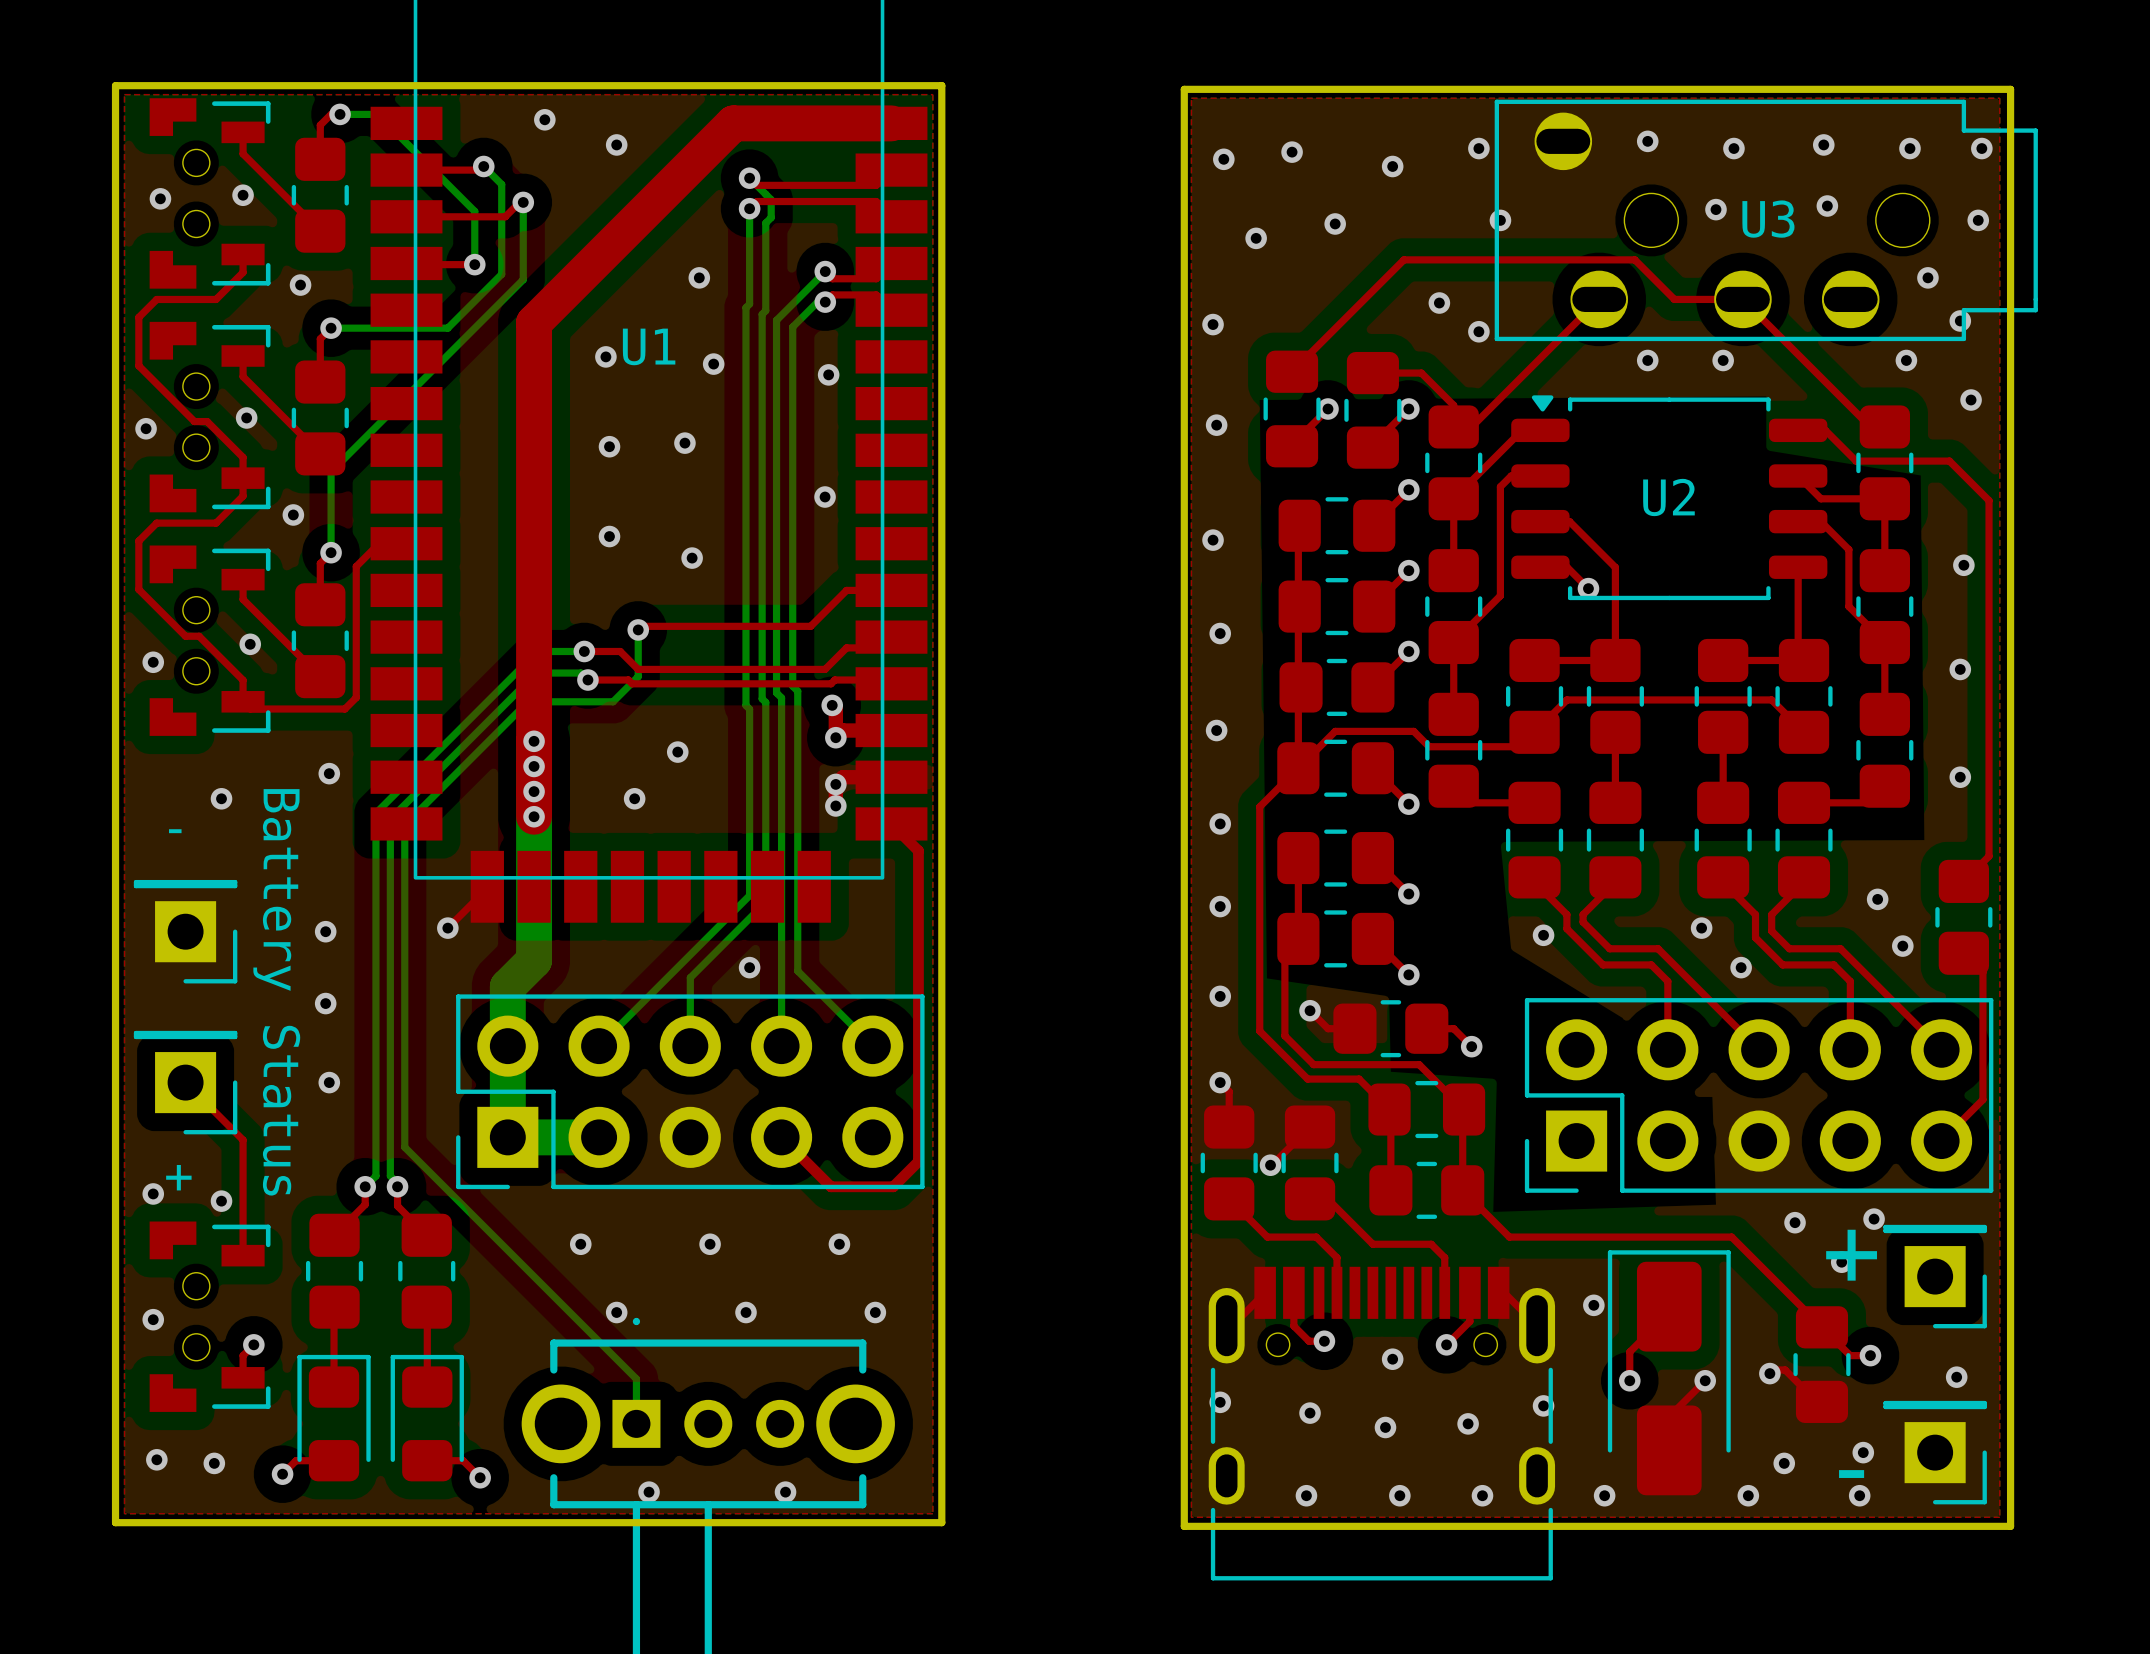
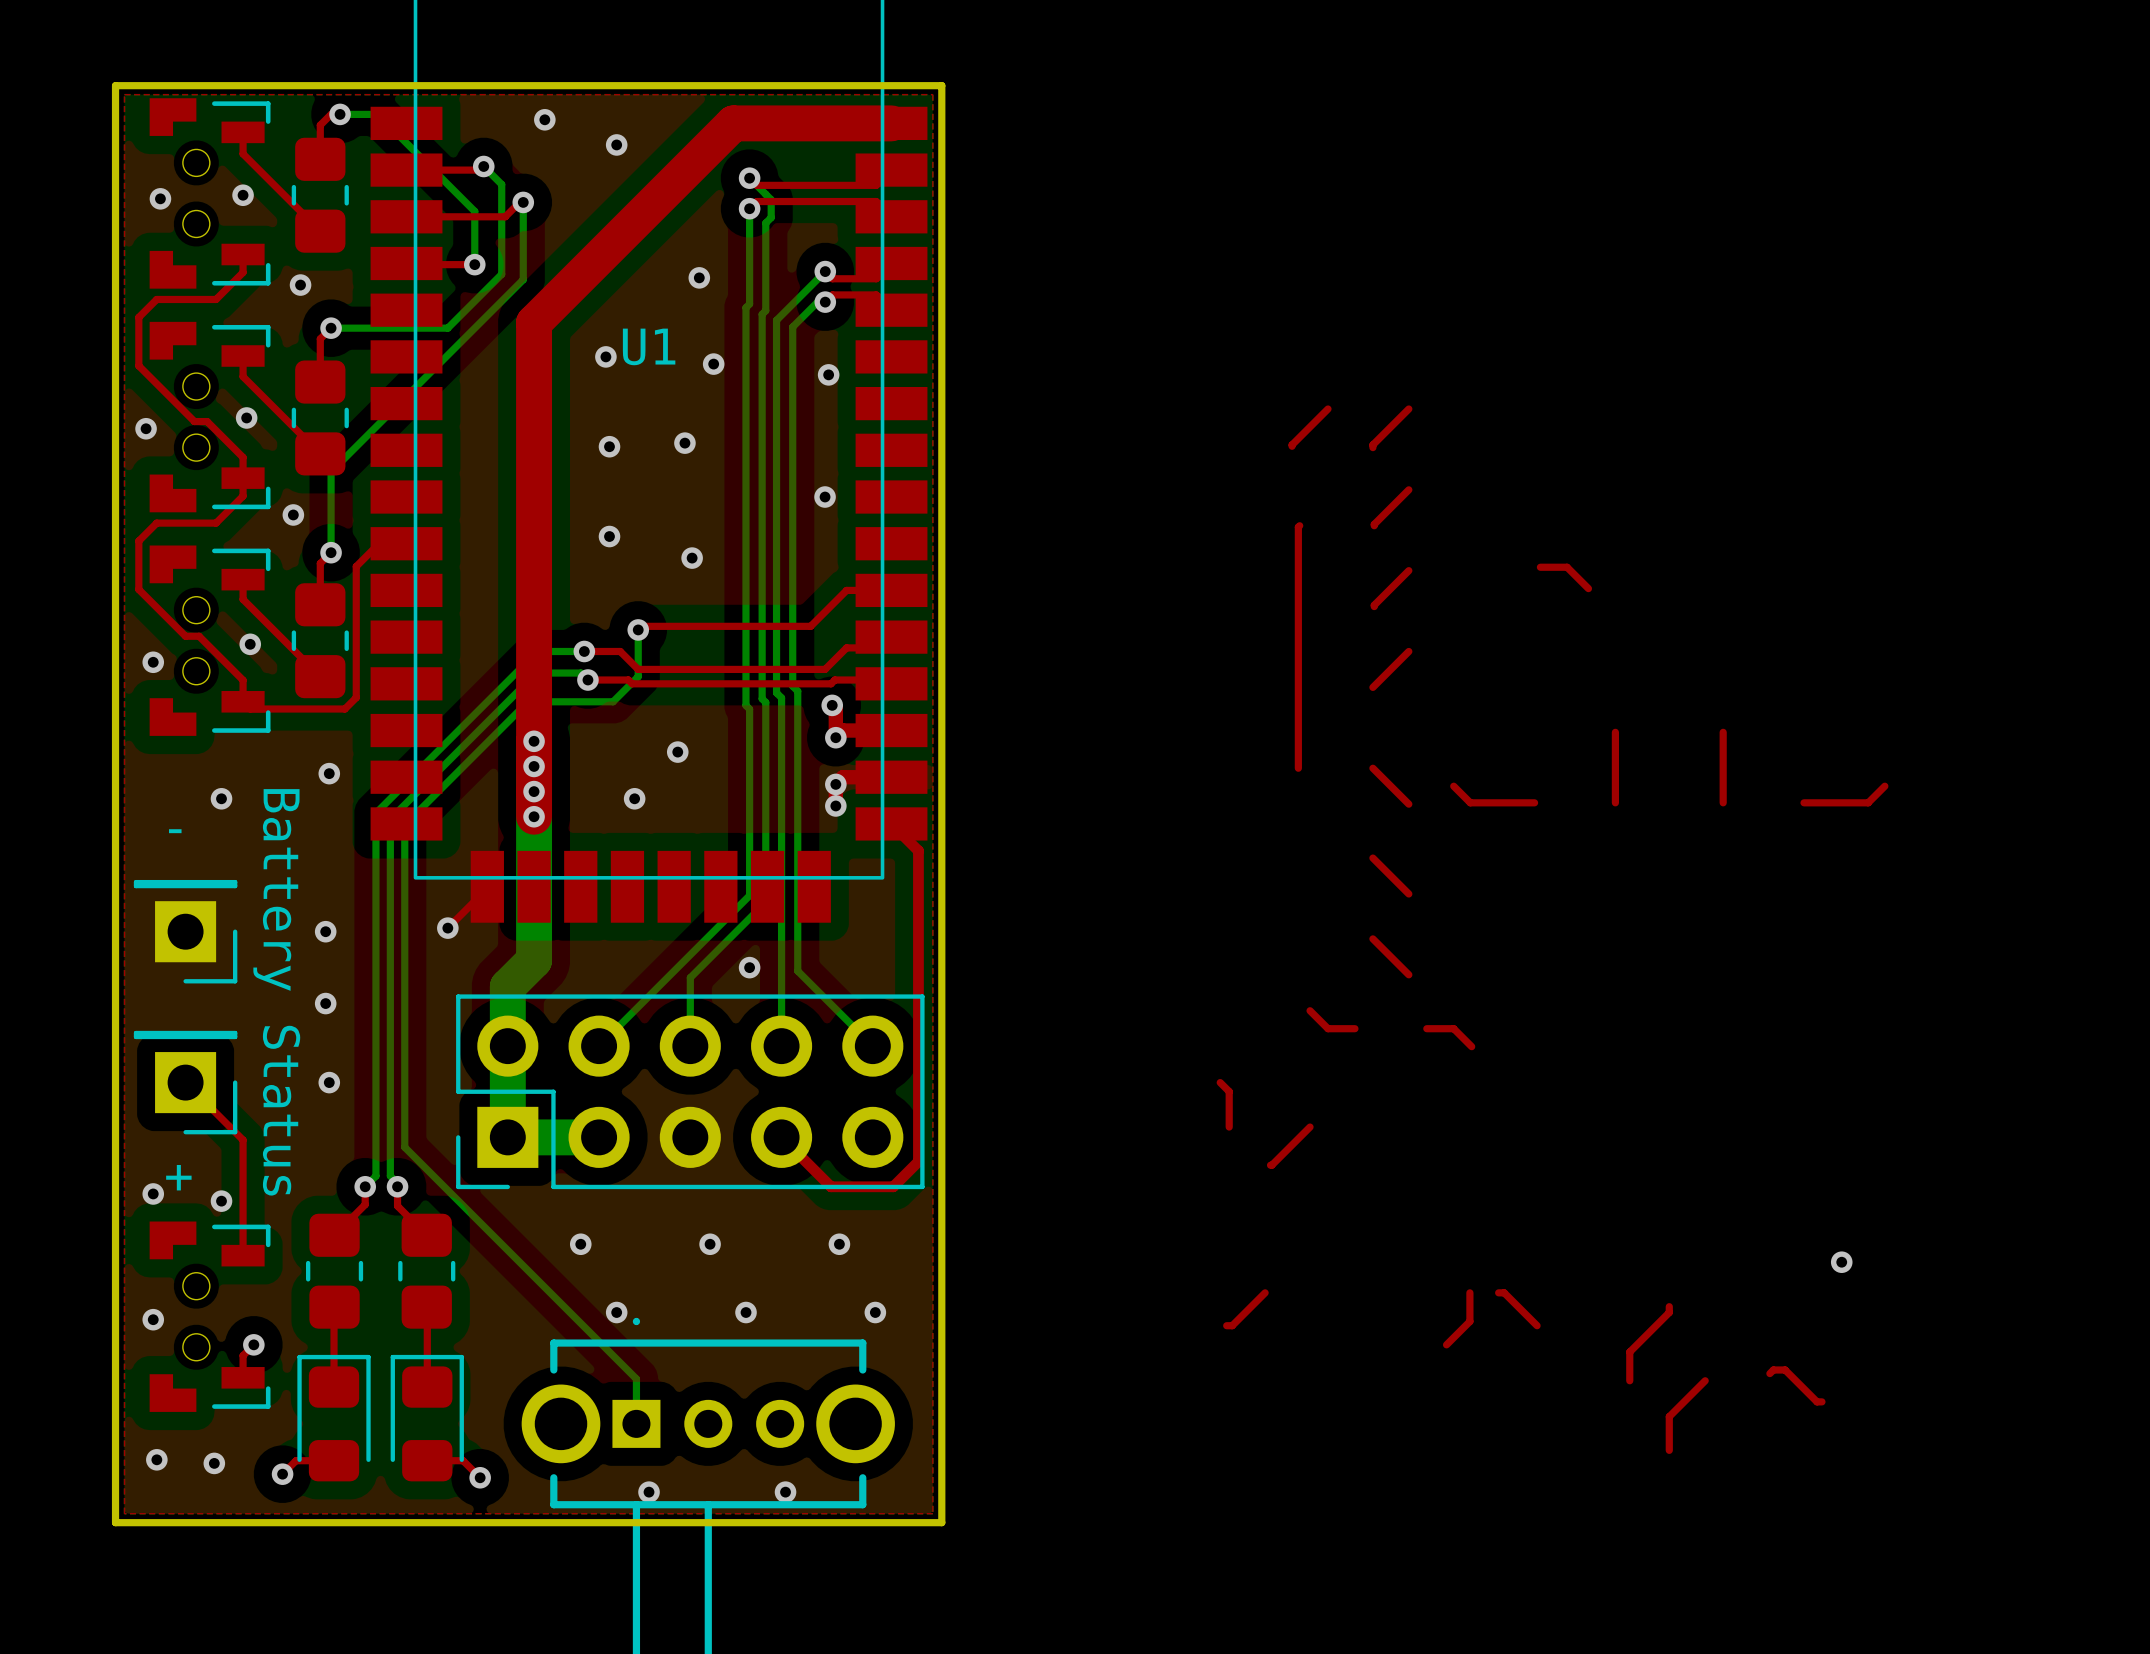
board edge: (1184, 89) (2010, 89) (2010, 1526) (1184, 1526) (1184, 89) -> none
top zone outline: (1191, 98) (1999, 98) (1999, 1517) (1191, 1517) (1191, 98) -> none
via: (1647, 141) -> none
via: (1823, 144) -> none
via: (1478, 148) -> none
via: (1733, 148) -> none
via: (1909, 148) -> none
via: (1981, 148) -> none
via: (1292, 152) -> none
via: (1223, 159) -> none
via: (1392, 166) -> none
via: (1827, 206) -> none
via: (1715, 209) -> none
via: (1500, 220) -> none
U3: (1766, 220) -> none
via: (1978, 220) -> none
via: (1335, 223) -> none
via: (1256, 238) -> none
via: (1927, 277) -> none
top track: (1599, 299) (1471, 426) (1453, 426) (1453, 405) (1421, 373) (1372, 373) -> none
via: (1439, 303) -> none
via: (1960, 320) -> none
via: (1213, 324) -> none
via: (1478, 331) -> none
via: (1647, 360) -> none
via: (1723, 360) -> none
via: (1906, 360) -> none
top track: (1292, 371) (1403, 259) (1634, 259) (1674, 299) (1742, 299) (1870, 426) (1884, 426) -> none
via: (1971, 400) -> none
part: (1292, 408) -> none
via: (1328, 408) -> none
via: (1408, 408) -> none
part: (1372, 410) -> none
via: (1216, 425) -> none
top track: (1540, 430) (1522, 430) (1453, 498) (1453, 570) -> none
top track: (1798, 430) (1825, 430) (1856, 461) (1949, 461) (1989, 500) (1989, 856) (1963, 881) -> none
part: (1453, 462) -> none
part: (1884, 462) -> none
top track: (1540, 475) (1511, 475) (1500, 486) (1500, 595) (1453, 642) (1453, 714) -> none
top track: (1798, 475) (1820, 498) (1884, 498) (1884, 570) -> none
via: (1408, 489) -> none
U2: (1669, 497) -> none
top track: (1540, 521) (1569, 521) (1615, 567) (1615, 660) (1534, 660) -> none
top track: (1798, 521) (1820, 521) (1848, 549) (1848, 606) (1884, 642) (1884, 714) -> none
part: (1336, 525) -> none
via: (1213, 540) -> none
via: (1963, 565) -> none
top track: (1798, 567) (1798, 654) (1804, 660) (1723, 660) -> none
via: (1408, 570) -> none
via: (1588, 588) -> none
part: (1336, 606) -> none
part: (1453, 606) -> none
part: (1884, 606) -> none
via: (1220, 633) -> none
via: (1408, 651) -> none
via: (1960, 669) -> none
part: (1336, 687) -> none
part: (1534, 696) -> none
part: (1615, 696) -> none
part: (1723, 696) -> none
part: (1804, 696) -> none
via: (1216, 730) -> none
top track: (1804, 732) (1771, 699) (1566, 699) (1520, 746) (1429, 746) (1413, 731) (1335, 731) (1259, 806) (1259, 1031) (1307, 1079) (1359, 1079) (1390, 1110) (1390, 1190) -> none
part: (1453, 750) -> none
part: (1884, 750) -> none
part: (1335, 768) -> none
via: (1960, 777) -> none
via: (1408, 804) -> none
via: (1220, 823) -> none
part: (1534, 840) -> none
part: (1615, 840) -> none
part: (1723, 840) -> none
part: (1804, 840) -> none
top track: (1298, 858) (1298, 938) (1284, 952) (1284, 1035) (1313, 1064) (1419, 1064) (1464, 1109) (1462, 1190) (1509, 1237) (1731, 1237) (1850, 1355) (1870, 1355) -> none
part: (1335, 858) -> none
top track: (1534, 877) (1534, 882) (1566, 914) (1566, 928) (1603, 964) (1651, 964) (1667, 981) (1667, 1049) -> none
top track: (1615, 877) (1615, 882) (1583, 914) (1583, 922) (1609, 948) (1658, 948) (1759, 1049) -> none
top track: (1723, 877) (1723, 882) (1755, 914) (1755, 937) (1782, 964) (1833, 964) (1850, 981) (1850, 1049) -> none
top track: (1804, 877) (1804, 882) (1771, 914) (1771, 931) (1789, 948) (1840, 948) (1941, 1049) -> none
via: (1408, 893) -> none
via: (1877, 899) -> none
via: (1220, 906) -> none
part: (1963, 917) -> none
via: (1701, 928) -> none
via: (1543, 935) -> none
part: (1335, 938) -> none
via: (1902, 946) -> none
top track: (1963, 953) (1982, 972) (1982, 1099) (1941, 1141) -> none
via: (1741, 967) -> none
via: (1408, 974) -> none
via: (1220, 996) -> none
via: (1310, 1010) -> none
part: (1390, 1028) -> none
via: (1471, 1046) -> none
via: (1220, 1082) -> none
part: (1759, 1095) -> none
part: (1426, 1109) -> none
part: (1229, 1162) -> none
part: (1310, 1162) -> none
via: (1270, 1165) -> none
part: (1426, 1190) -> none
top track: (1229, 1198) (1267, 1237) (1316, 1237) (1336, 1257) (1336, 1292) -> none
top track: (1310, 1198) (1327, 1198) (1372, 1244) (1431, 1244) (1444, 1257) (1444, 1292) -> none
via: (1874, 1219) -> none
via: (1795, 1222) -> none
text: + (1851, 1255) -> none
part: (1935, 1276) -> none
top track: (1293, 1292) (1293, 1326) (1309, 1341) (1324, 1341) -> none
via: (1593, 1305) -> none
via: (1324, 1341) -> none
via: (1446, 1344) -> none
via: (1870, 1355) -> none
via: (1392, 1359) -> none
part: (1821, 1364) -> none
part: (1669, 1372) -> none
via: (1769, 1373) -> none
via: (1956, 1377) -> none
via: (1629, 1380) -> none
via: (1705, 1380) -> none
via: (1220, 1402) -> none
via: (1543, 1405) -> none
via: (1310, 1413) -> none
part: (1381, 1423) -> none
via: (1468, 1423) -> none
via: (1385, 1427) -> none
via: (1863, 1452) -> none
part: (1935, 1452) -> none
via: (1784, 1463) -> none
text: - (1851, 1474) -> none
via: (1306, 1495) -> none
via: (1399, 1495) -> none
via: (1482, 1495) -> none
via: (1604, 1495) -> none
via: (1748, 1495) -> none
via: (1859, 1495) -> none

